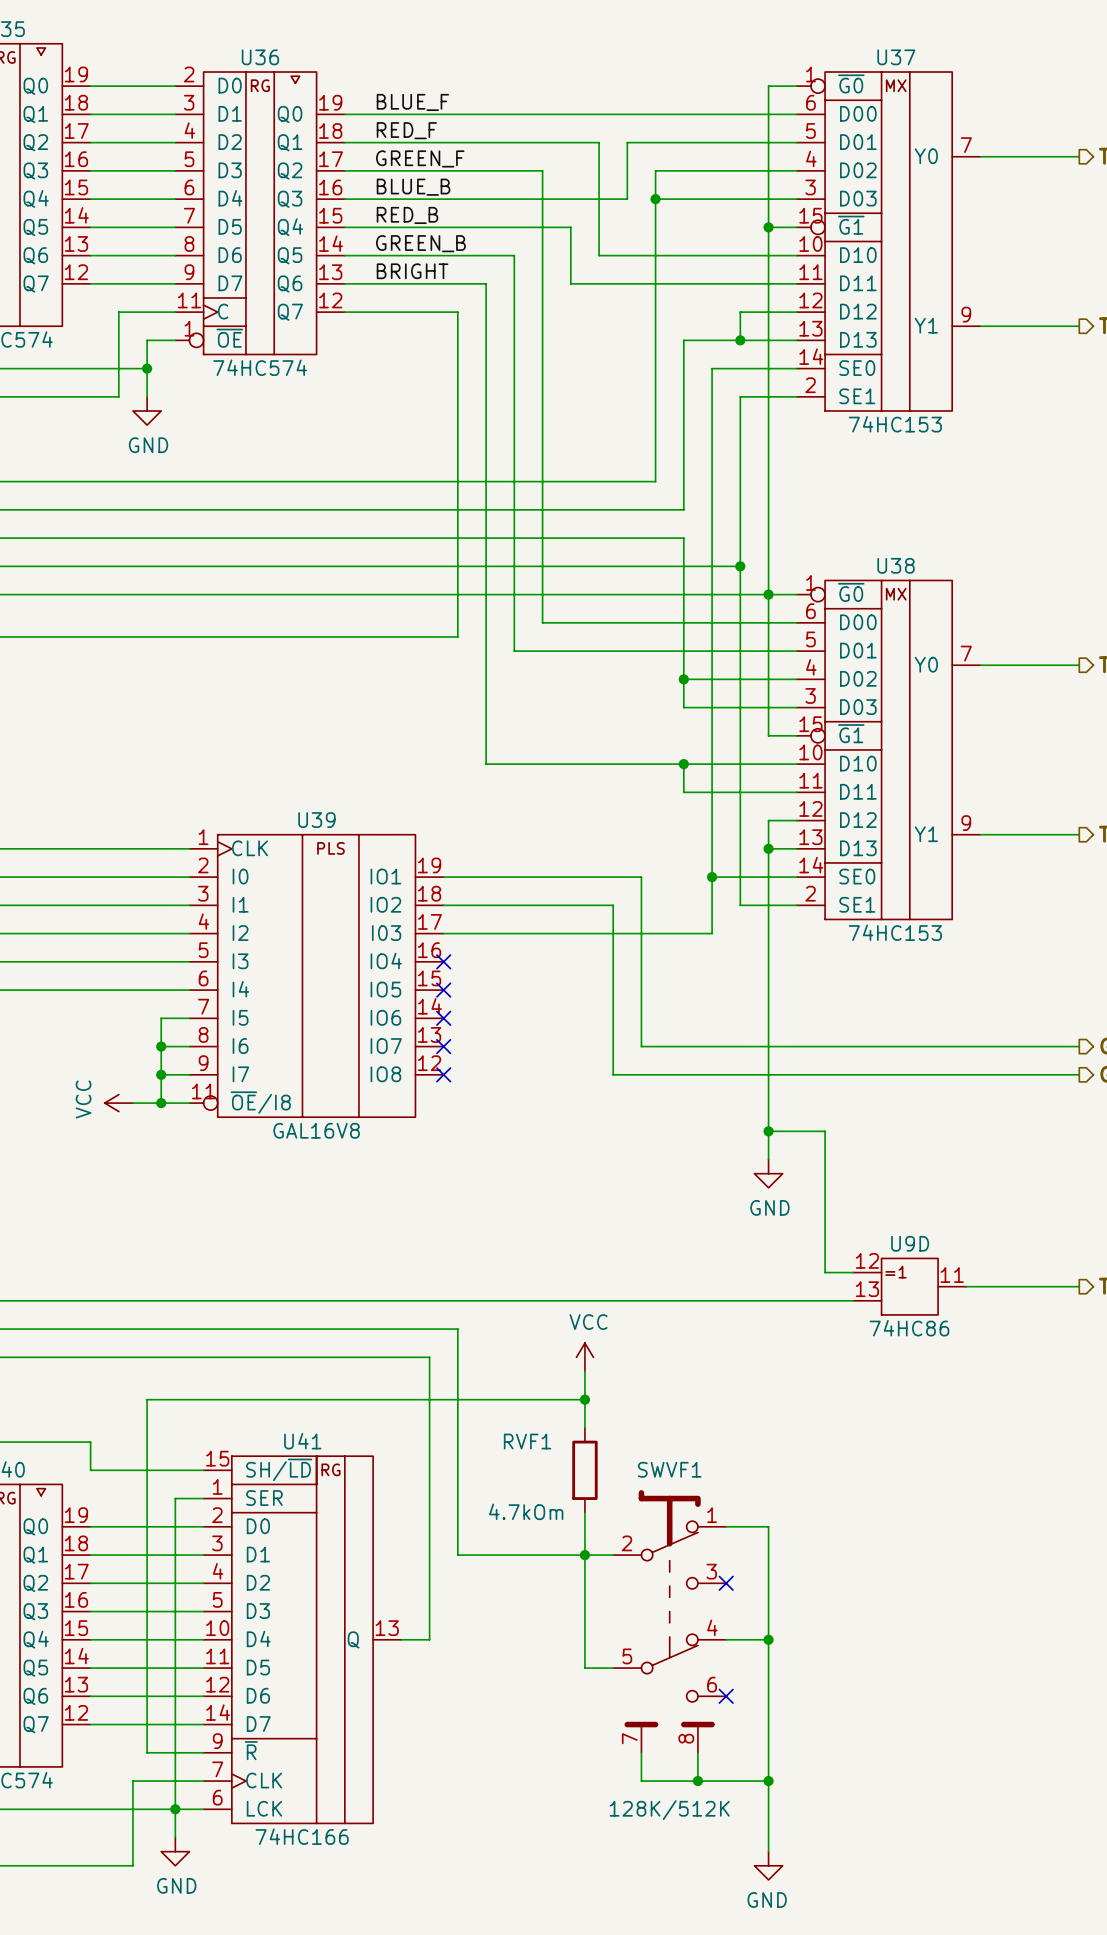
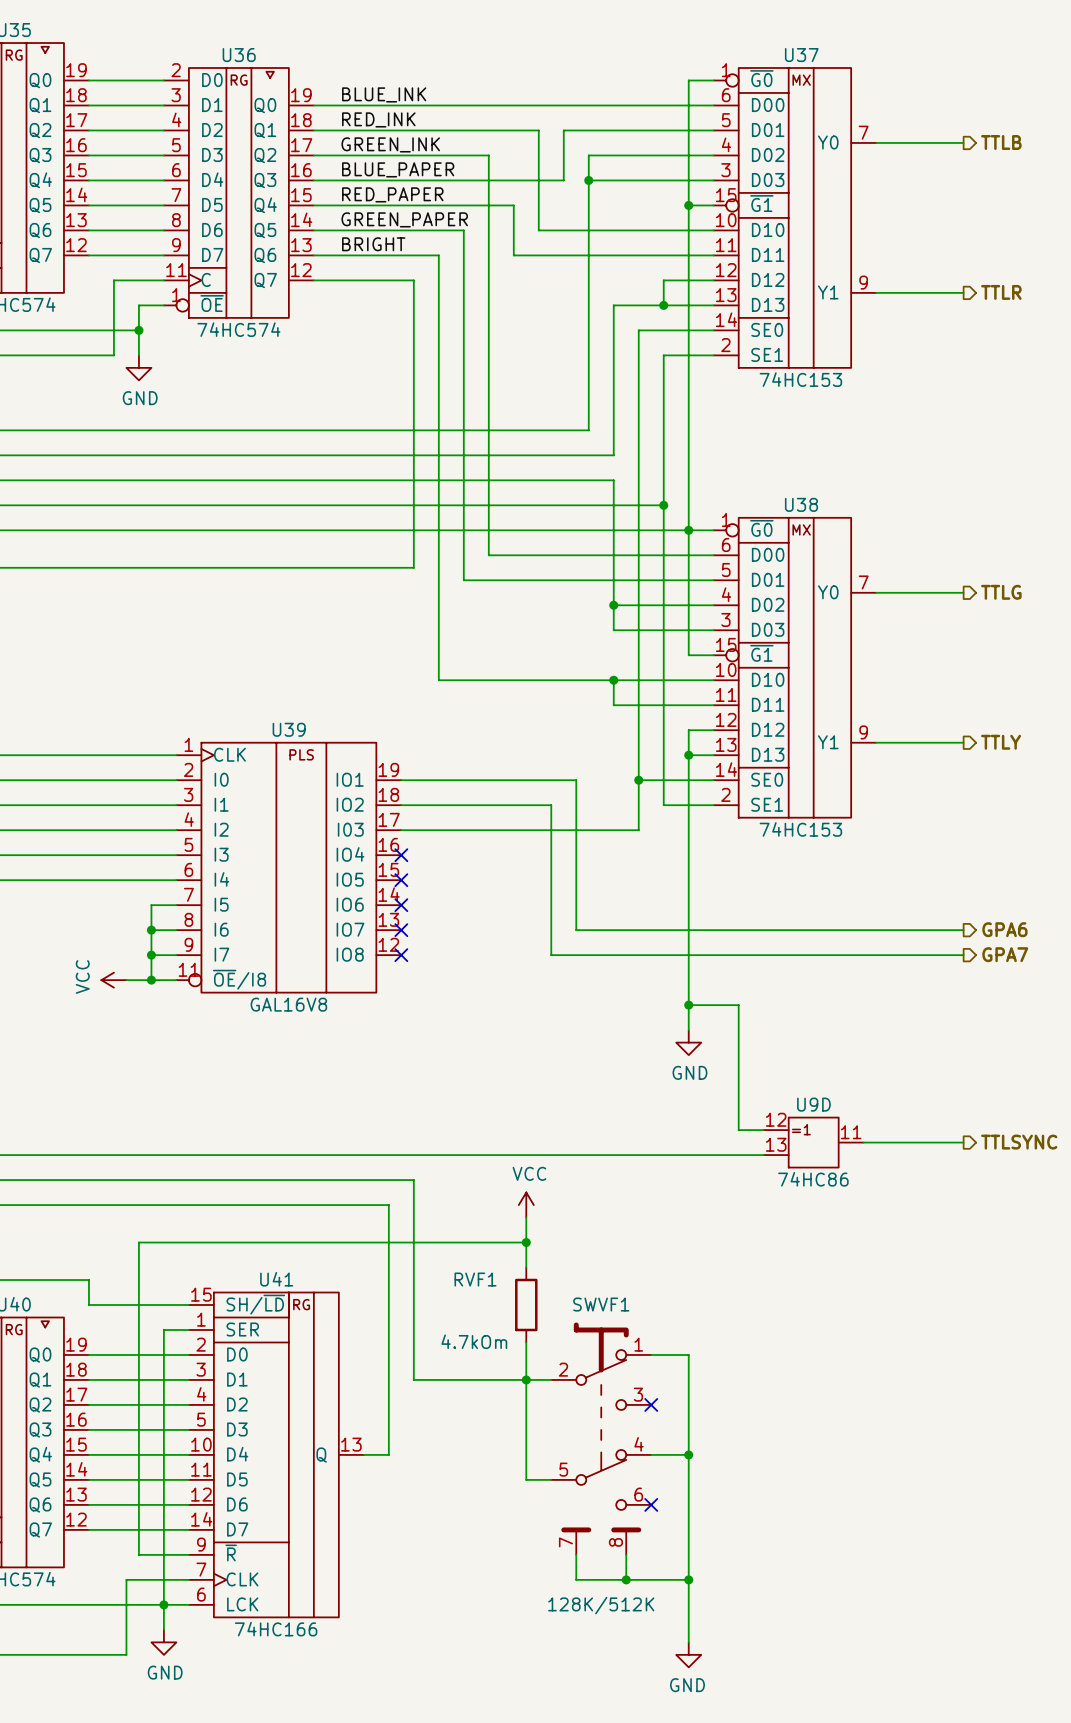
label: BLUE_F (412, 102) -> BLUE_INK (384, 94)
label: RED_F (406, 130) -> RED_INK (378, 119)
label: GREEN_F (420, 158) -> GREEN_INK (390, 144)
label: BLUE_B (413, 187) -> BLUE_PAPER (398, 169)
label: RED_B (407, 215) -> RED_PAPER (392, 194)
label: GREEN_B (420, 243) -> GREEN_PAPER (404, 219)

